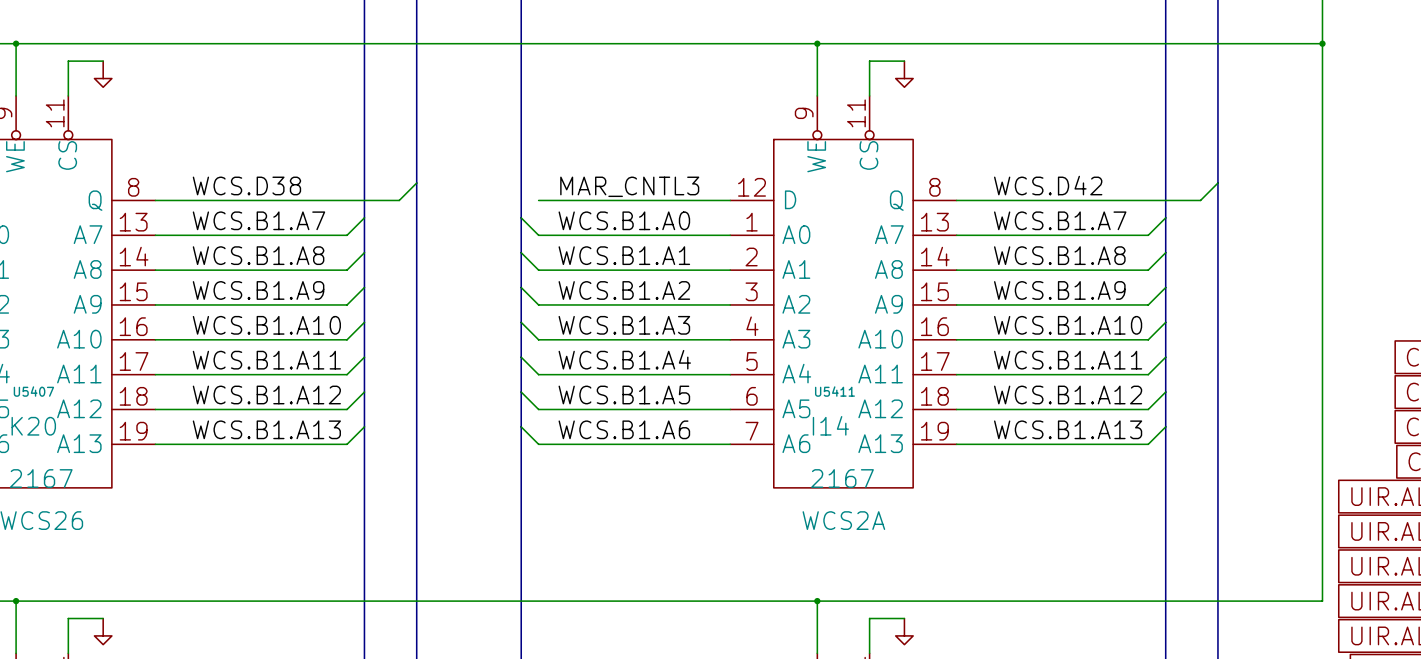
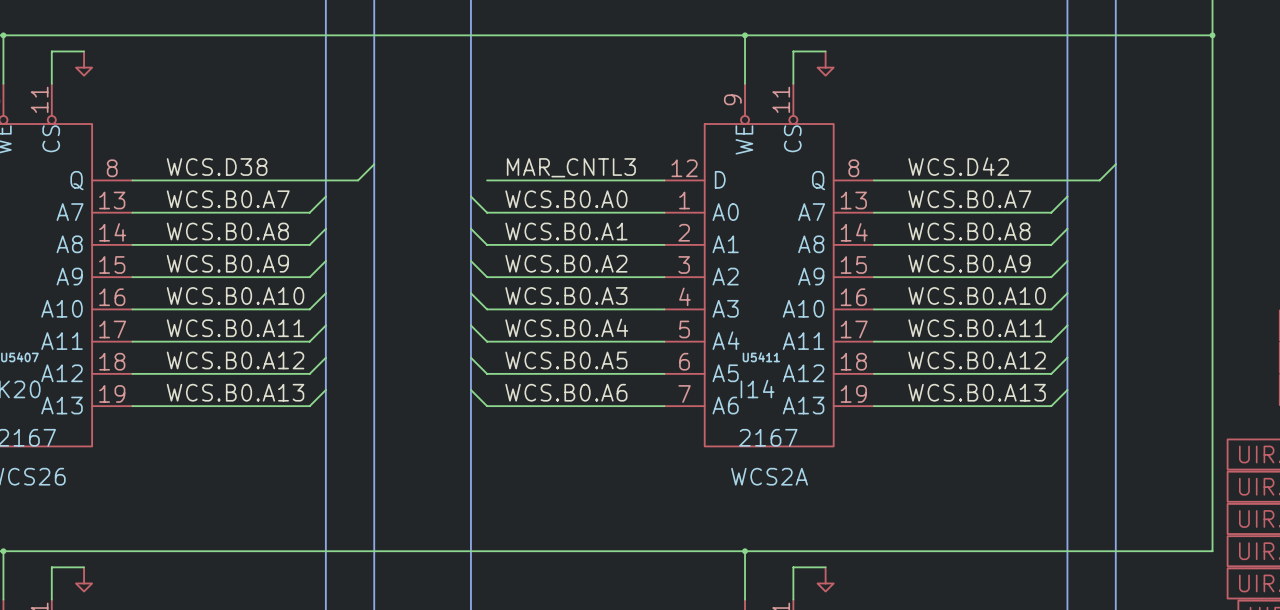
label: WCS.B1.A7 (258, 220) -> WCS.B0.A7 (228, 199)
label: WCS.B1.A0 (624, 220) -> WCS.B0.A0 (566, 199)
label: WCS.B1.A7 (1060, 220) -> WCS.B0.A7 (969, 199)
label: WCS.B1.A8 (258, 255) -> WCS.B0.A8 (227, 231)
label: WCS.B1.A1 (624, 255) -> WCS.B0.A1 (566, 231)
label: WCS.B1.A8 (1059, 255) -> WCS.B0.A8 (969, 231)
label: WCS.B1.A9 (258, 290) -> WCS.B0.A9 (227, 263)
label: WCS.B1.A2 (624, 290) -> WCS.B0.A2 (566, 263)
label: WCS.B1.A9 (1059, 290) -> WCS.B0.A9 (969, 263)
label: WCS.B1.A10 (266, 325) -> WCS.B0.A10 (235, 295)
label: WCS.B1.A3 (624, 325) -> WCS.B0.A3 (566, 295)
label: WCS.B1.A10 (1068, 325) -> WCS.B0.A10 (977, 295)
label: WCS.B1.A4 (624, 359) -> WCS.B0.A4 (566, 327)
label: WCS.B1.A11 (266, 360) -> WCS.B0.A11 (235, 328)
label: WCS.B1.A11 (1068, 360) -> WCS.B0.A11 (977, 328)
label: WCS.B1.A12 (266, 394) -> WCS.B0.A12 (235, 360)
label: WCS.B1.A5 (624, 394) -> WCS.B0.A5 (566, 360)
label: WCS.B1.A12 (1068, 394) -> WCS.B0.A12 (977, 360)
label: WCS.B1.A13 (266, 429) -> WCS.B0.A13 (235, 392)
label: WCS.B1.A6 (624, 429) -> WCS.B0.A6 (566, 392)
label: WCS.B1.A13 (1068, 429) -> WCS.B0.A13 (977, 392)

